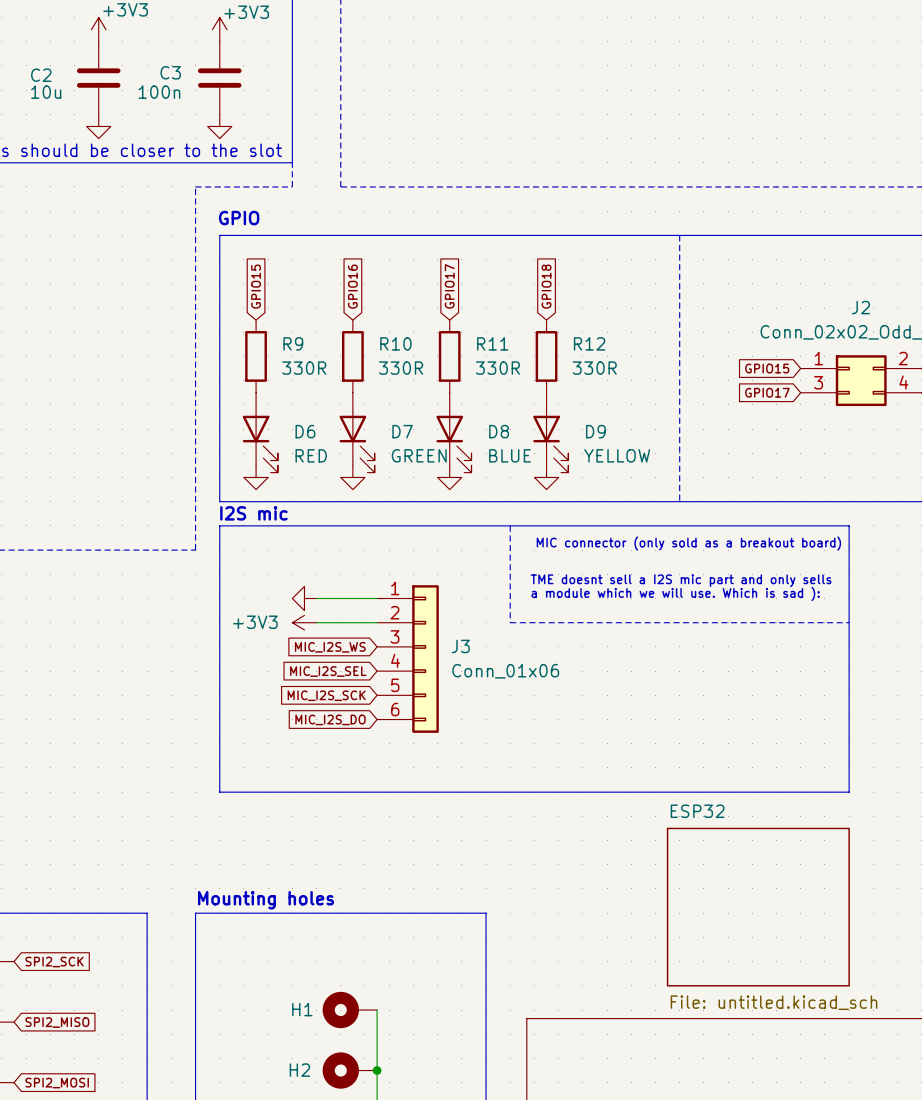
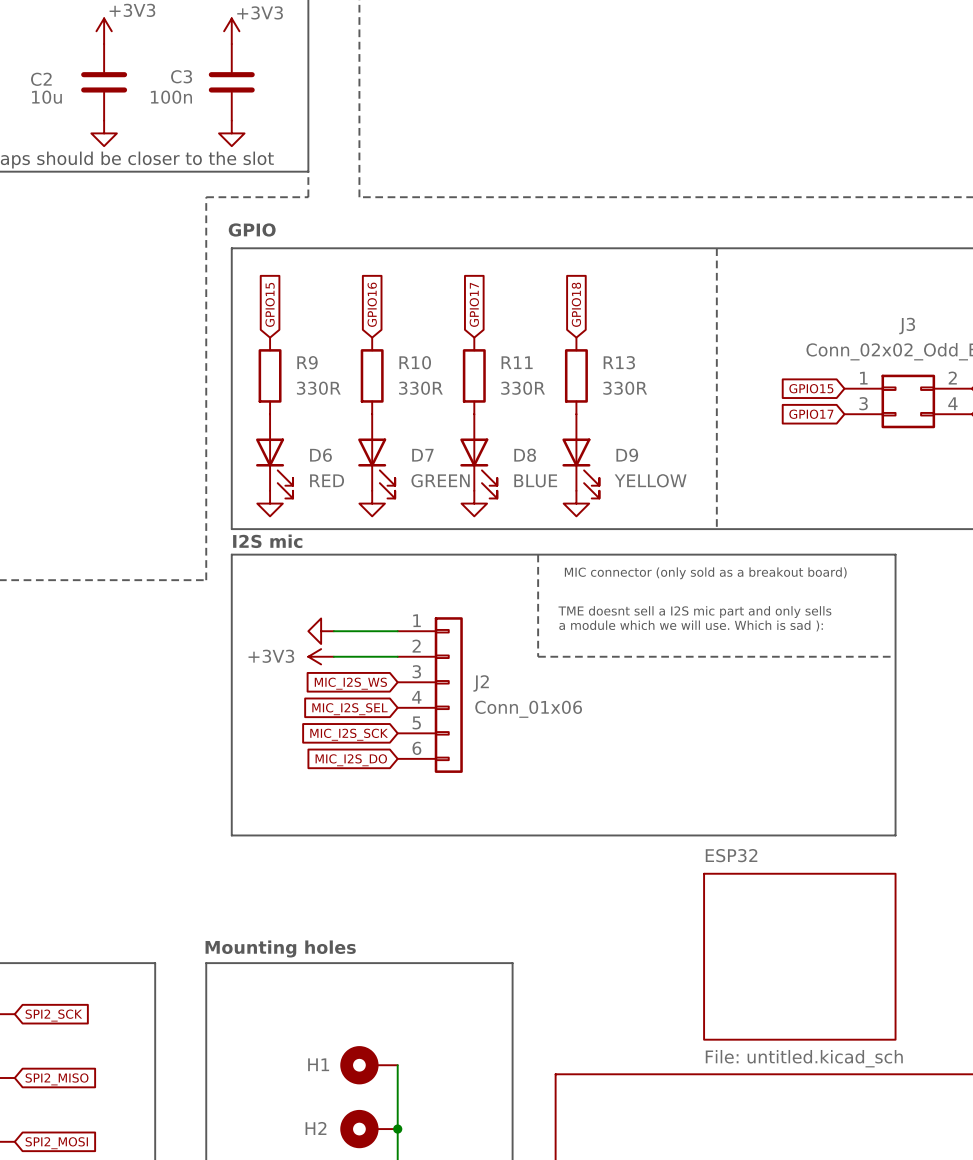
J2 name: J2 (860, 307) -> J3 (907, 326)
R12 name: R12 (589, 343) -> R13 (619, 362)
J3 name: J3 (460, 646) -> J2 (481, 683)

